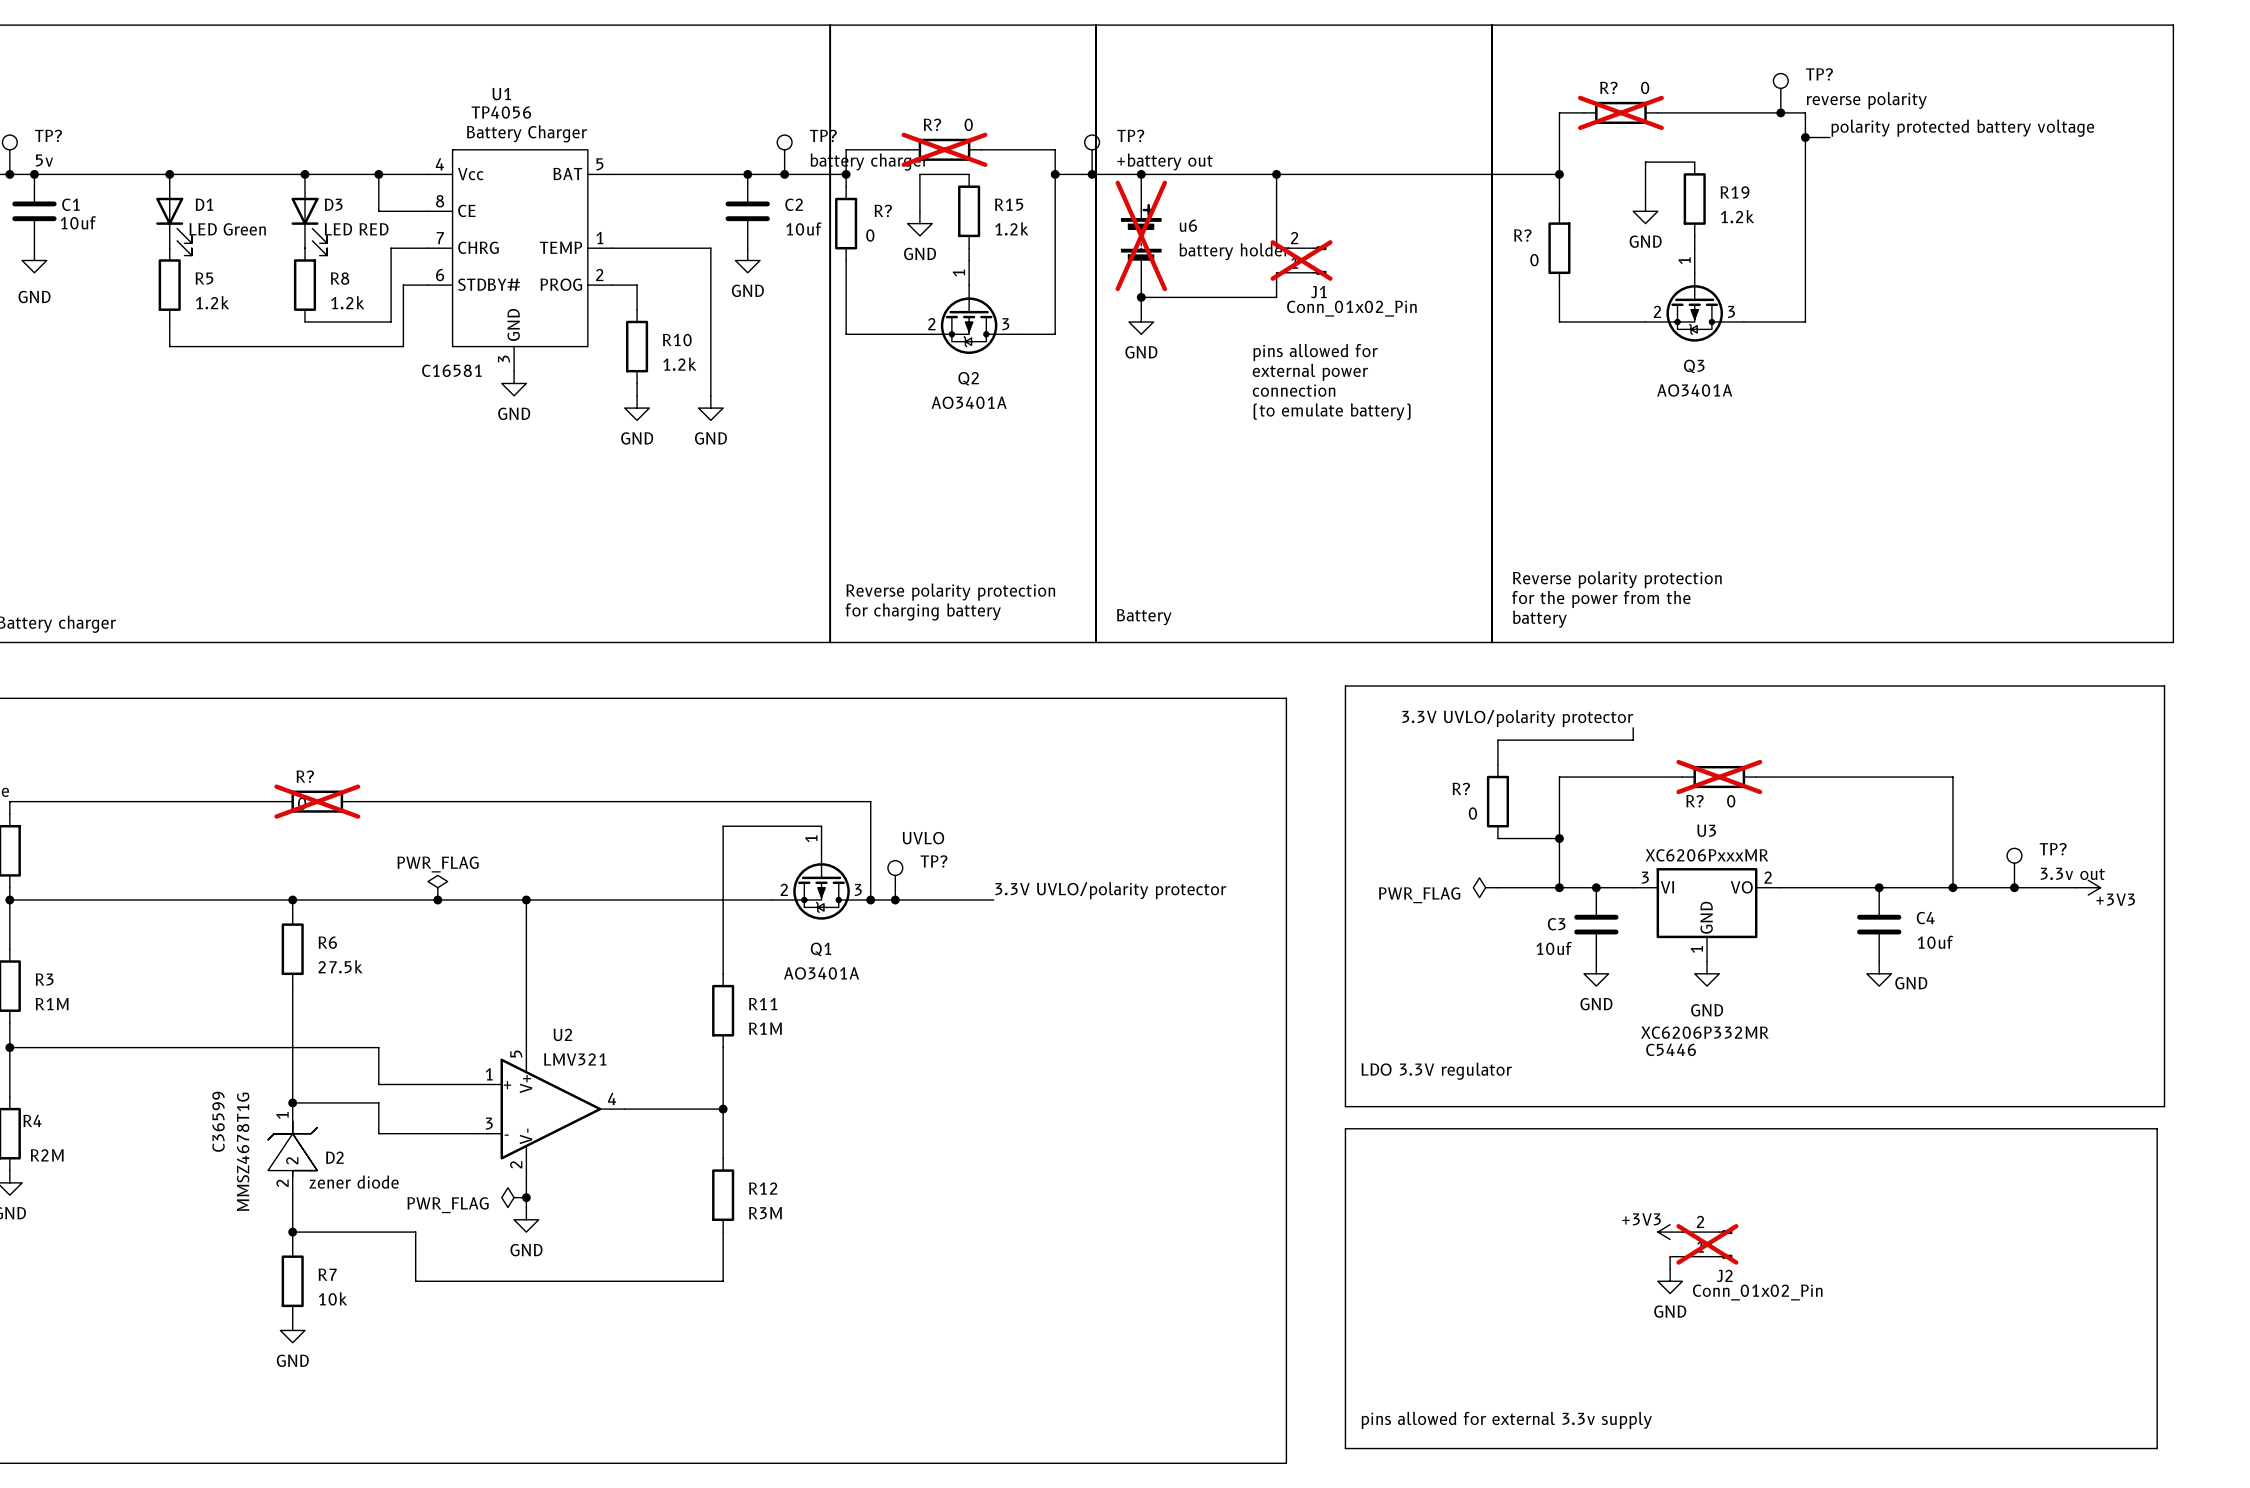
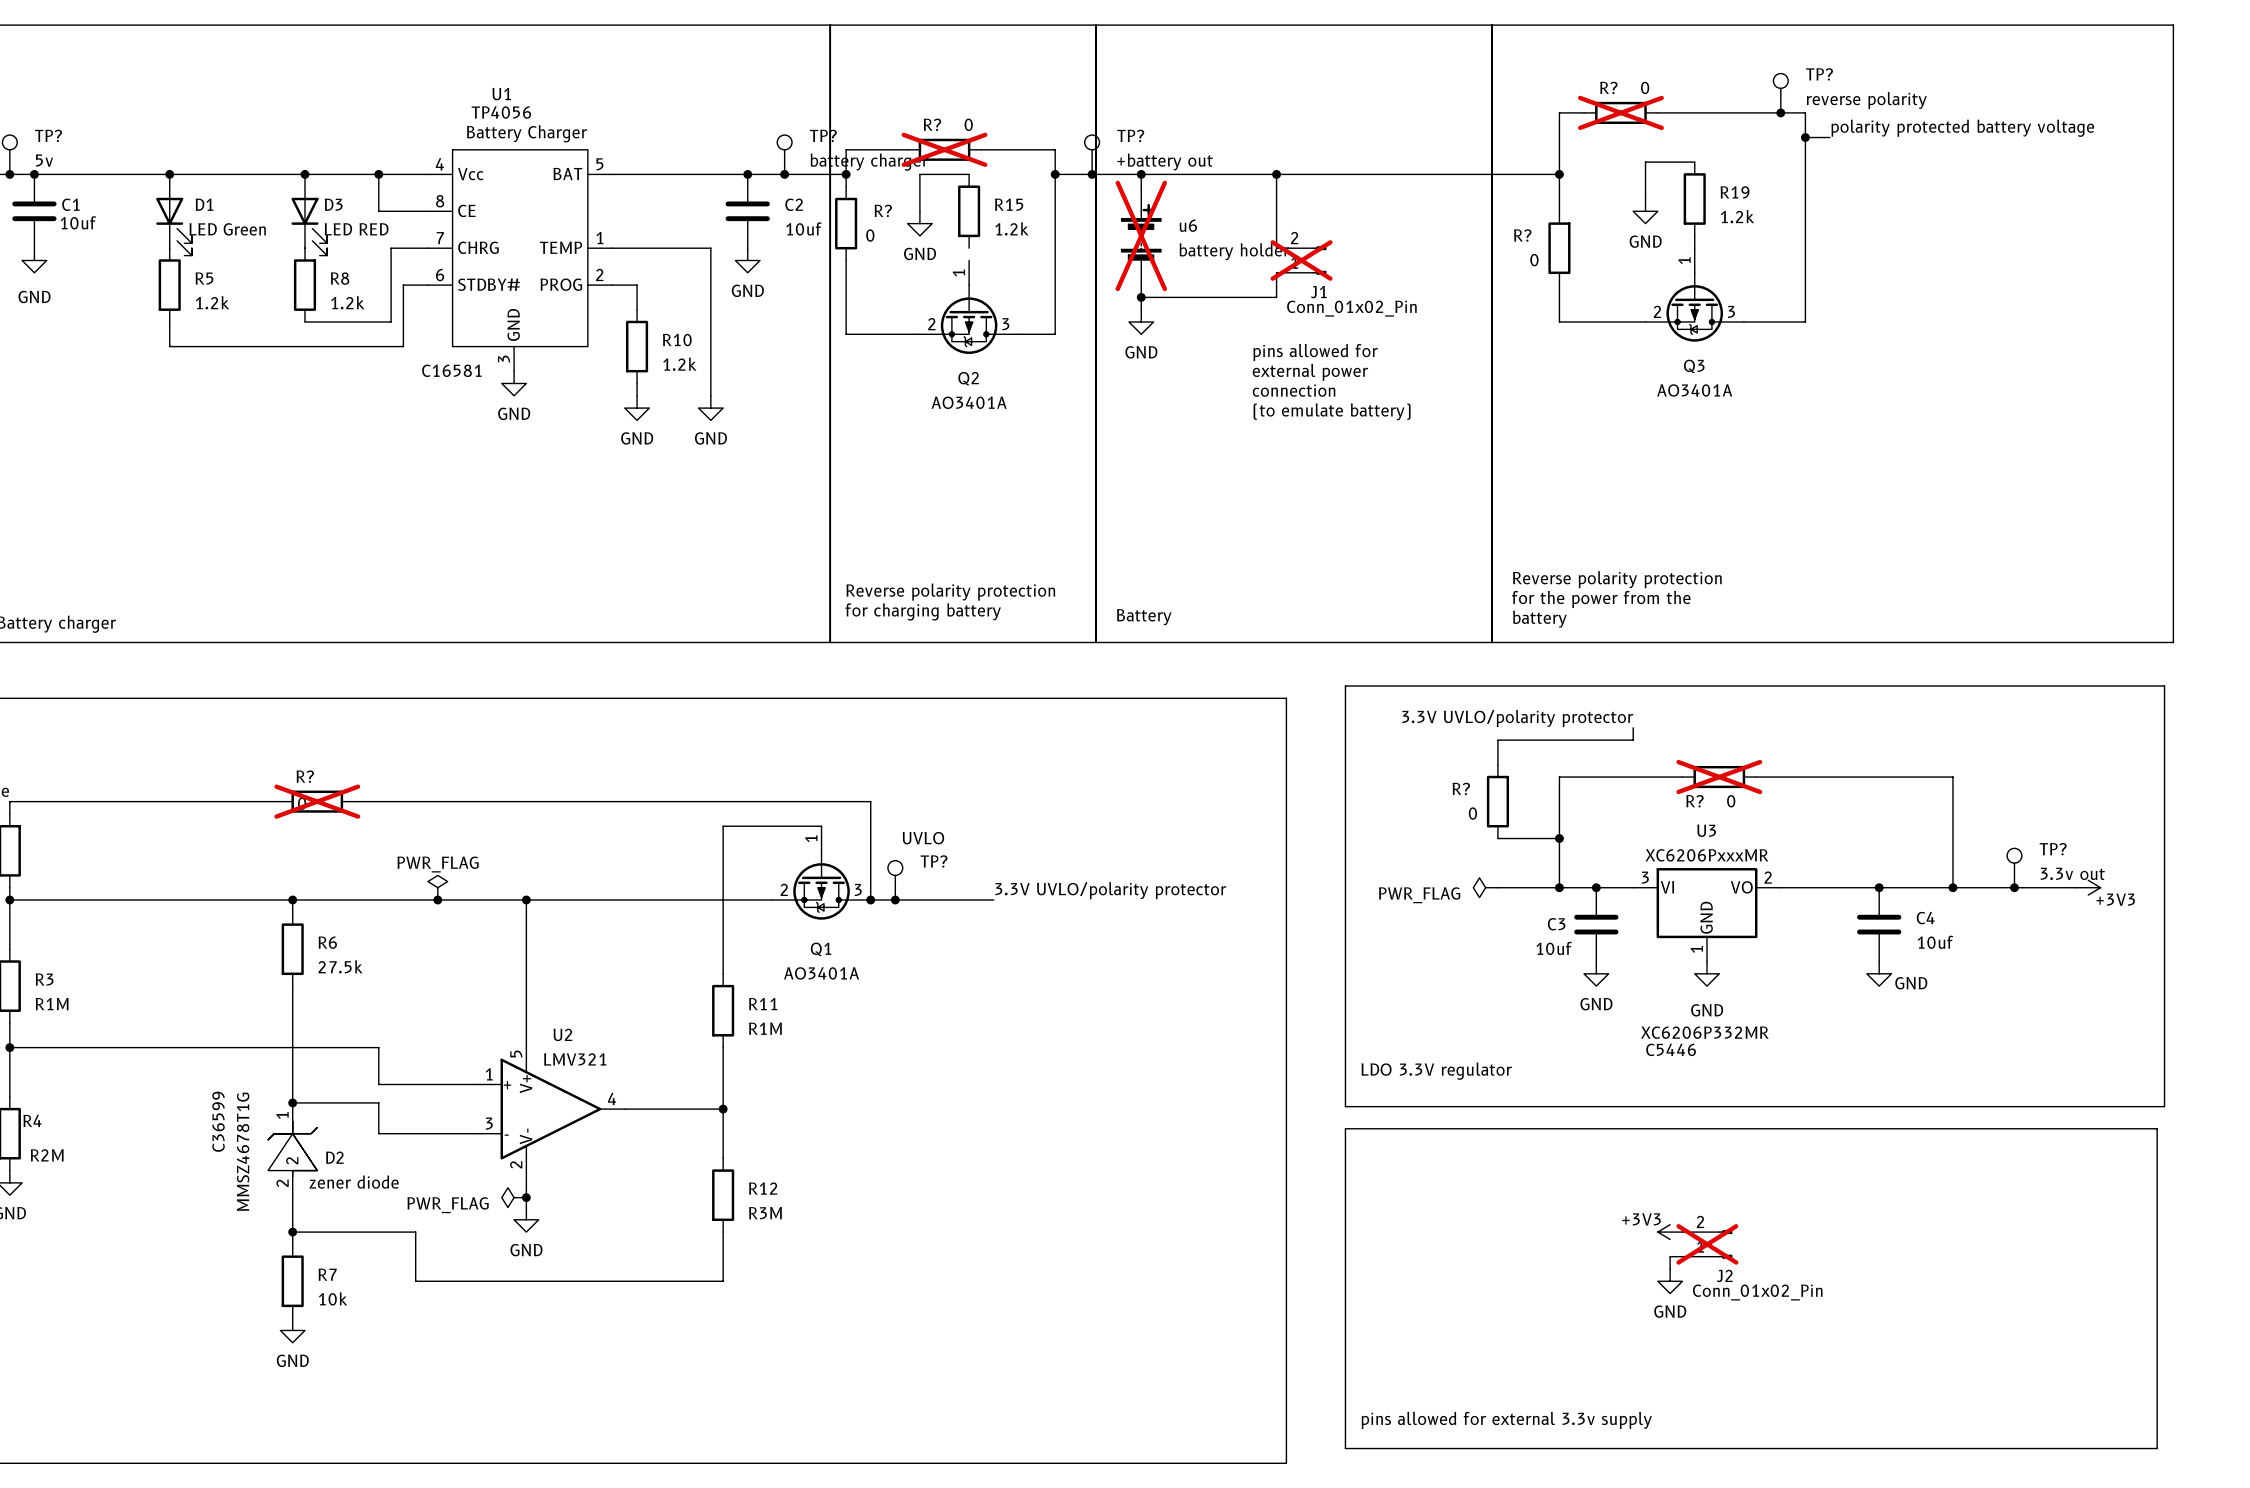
wire: (969, 248) (969, 260) -> none

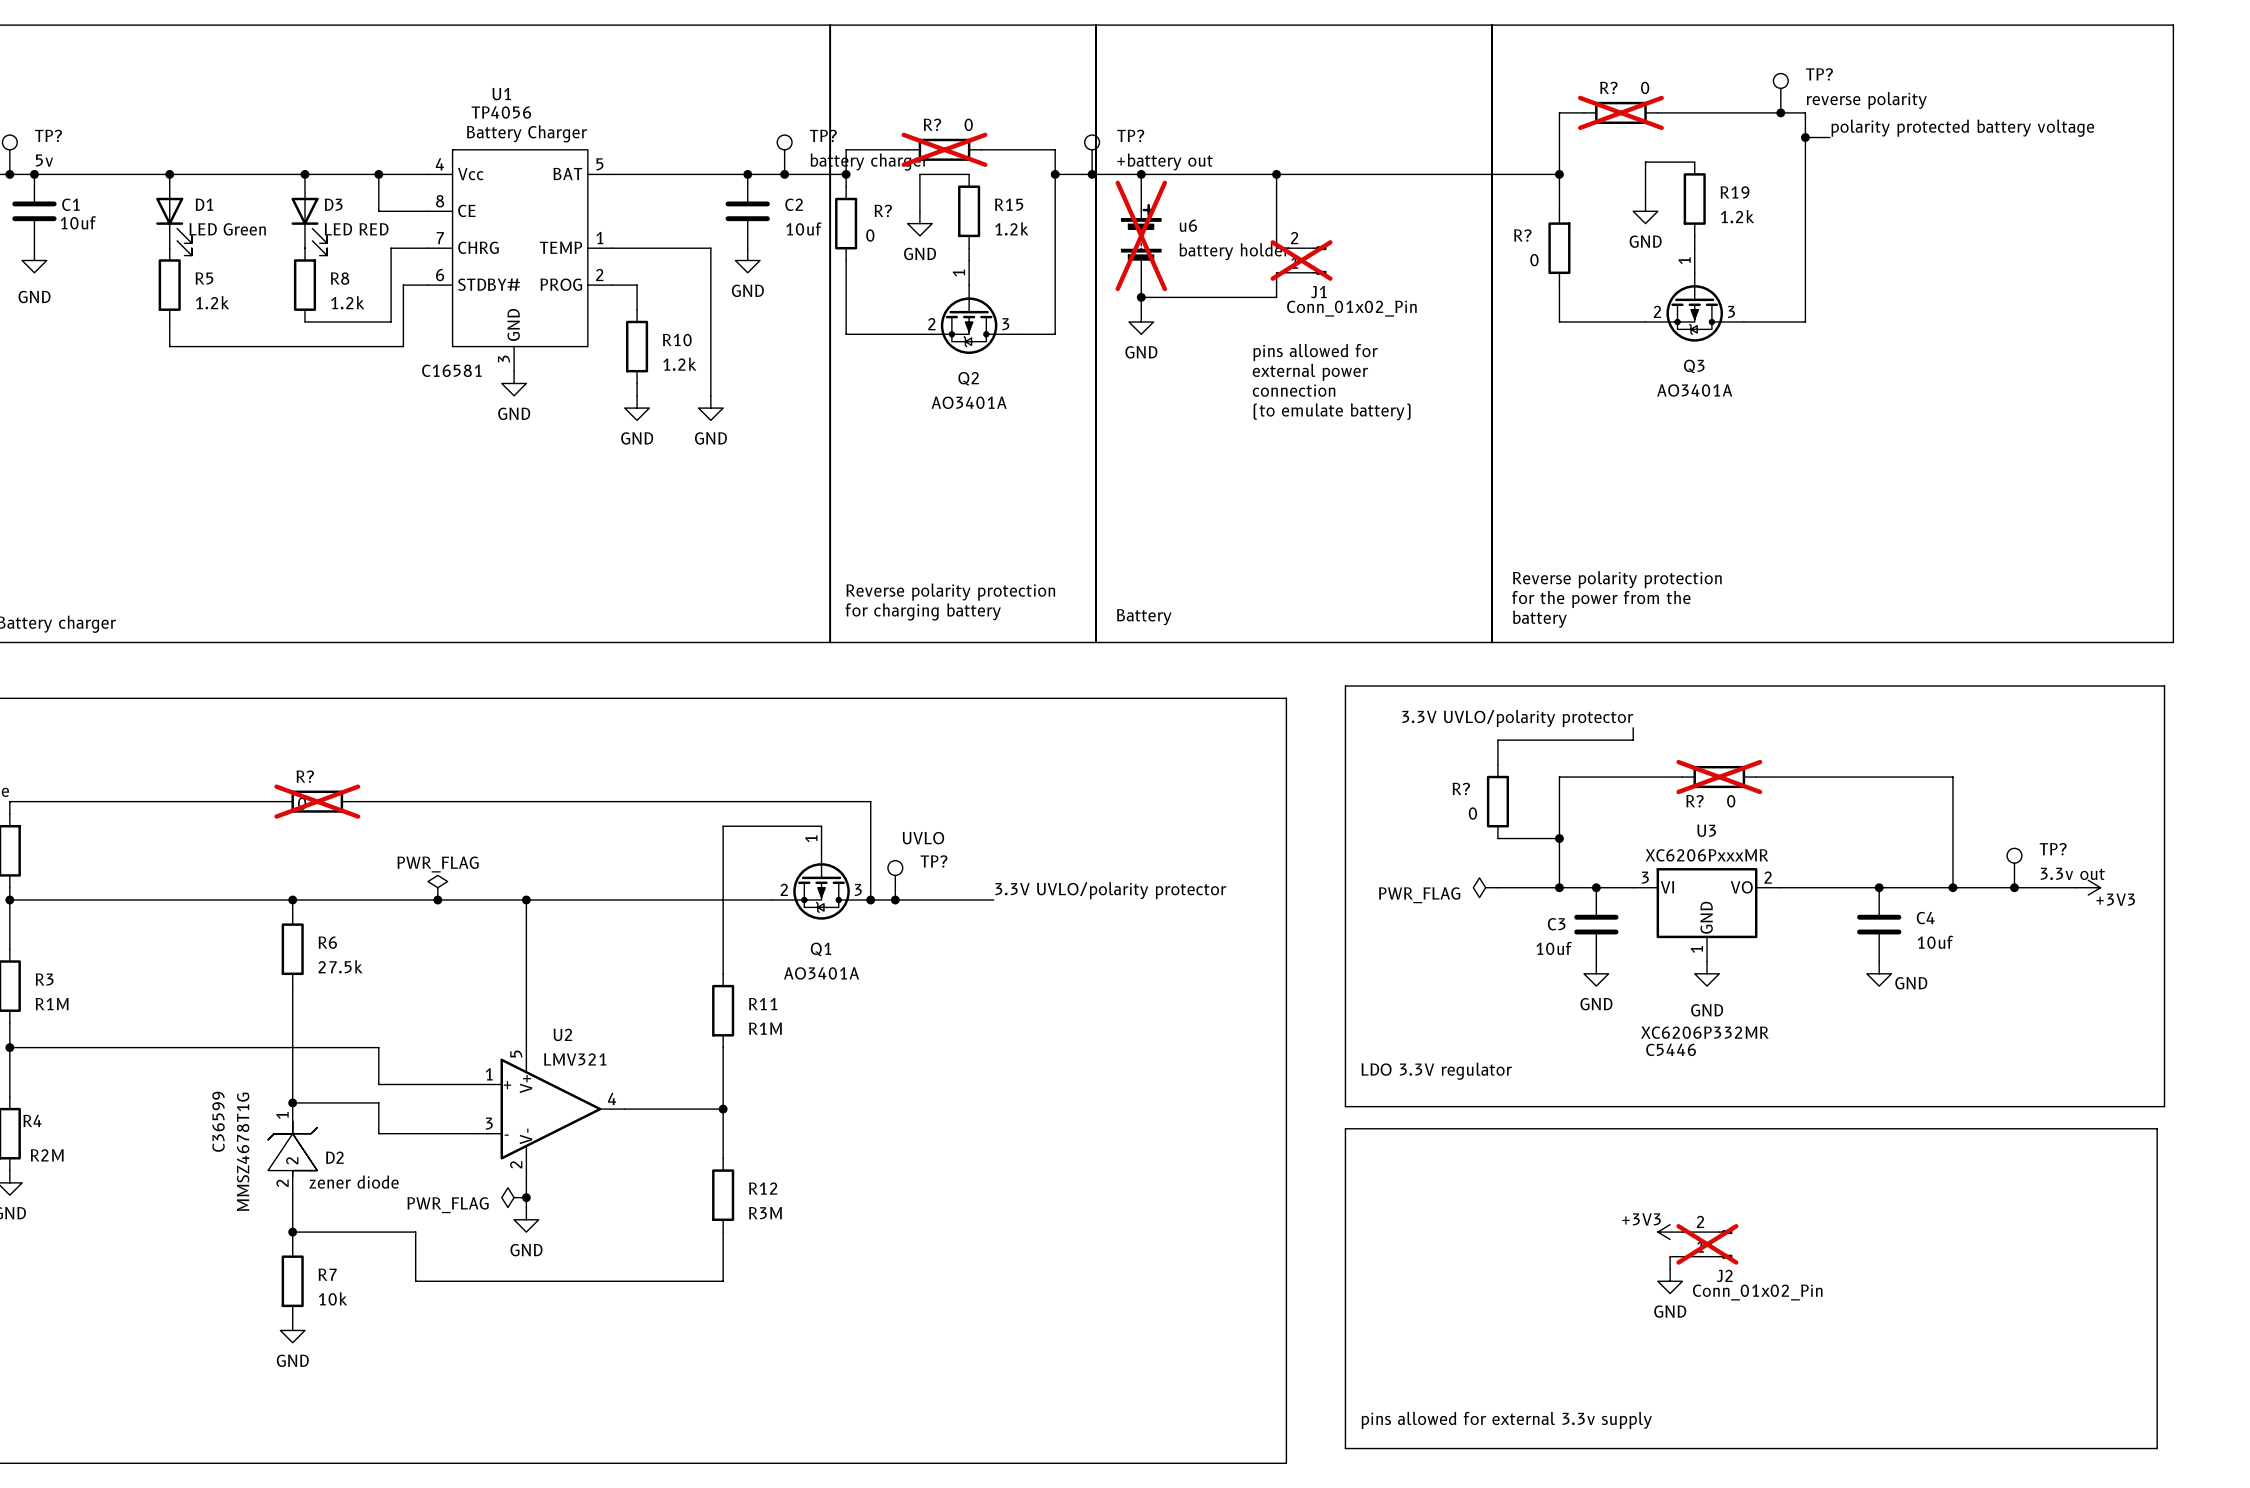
wire: none -> (969, 248) (969, 260)

